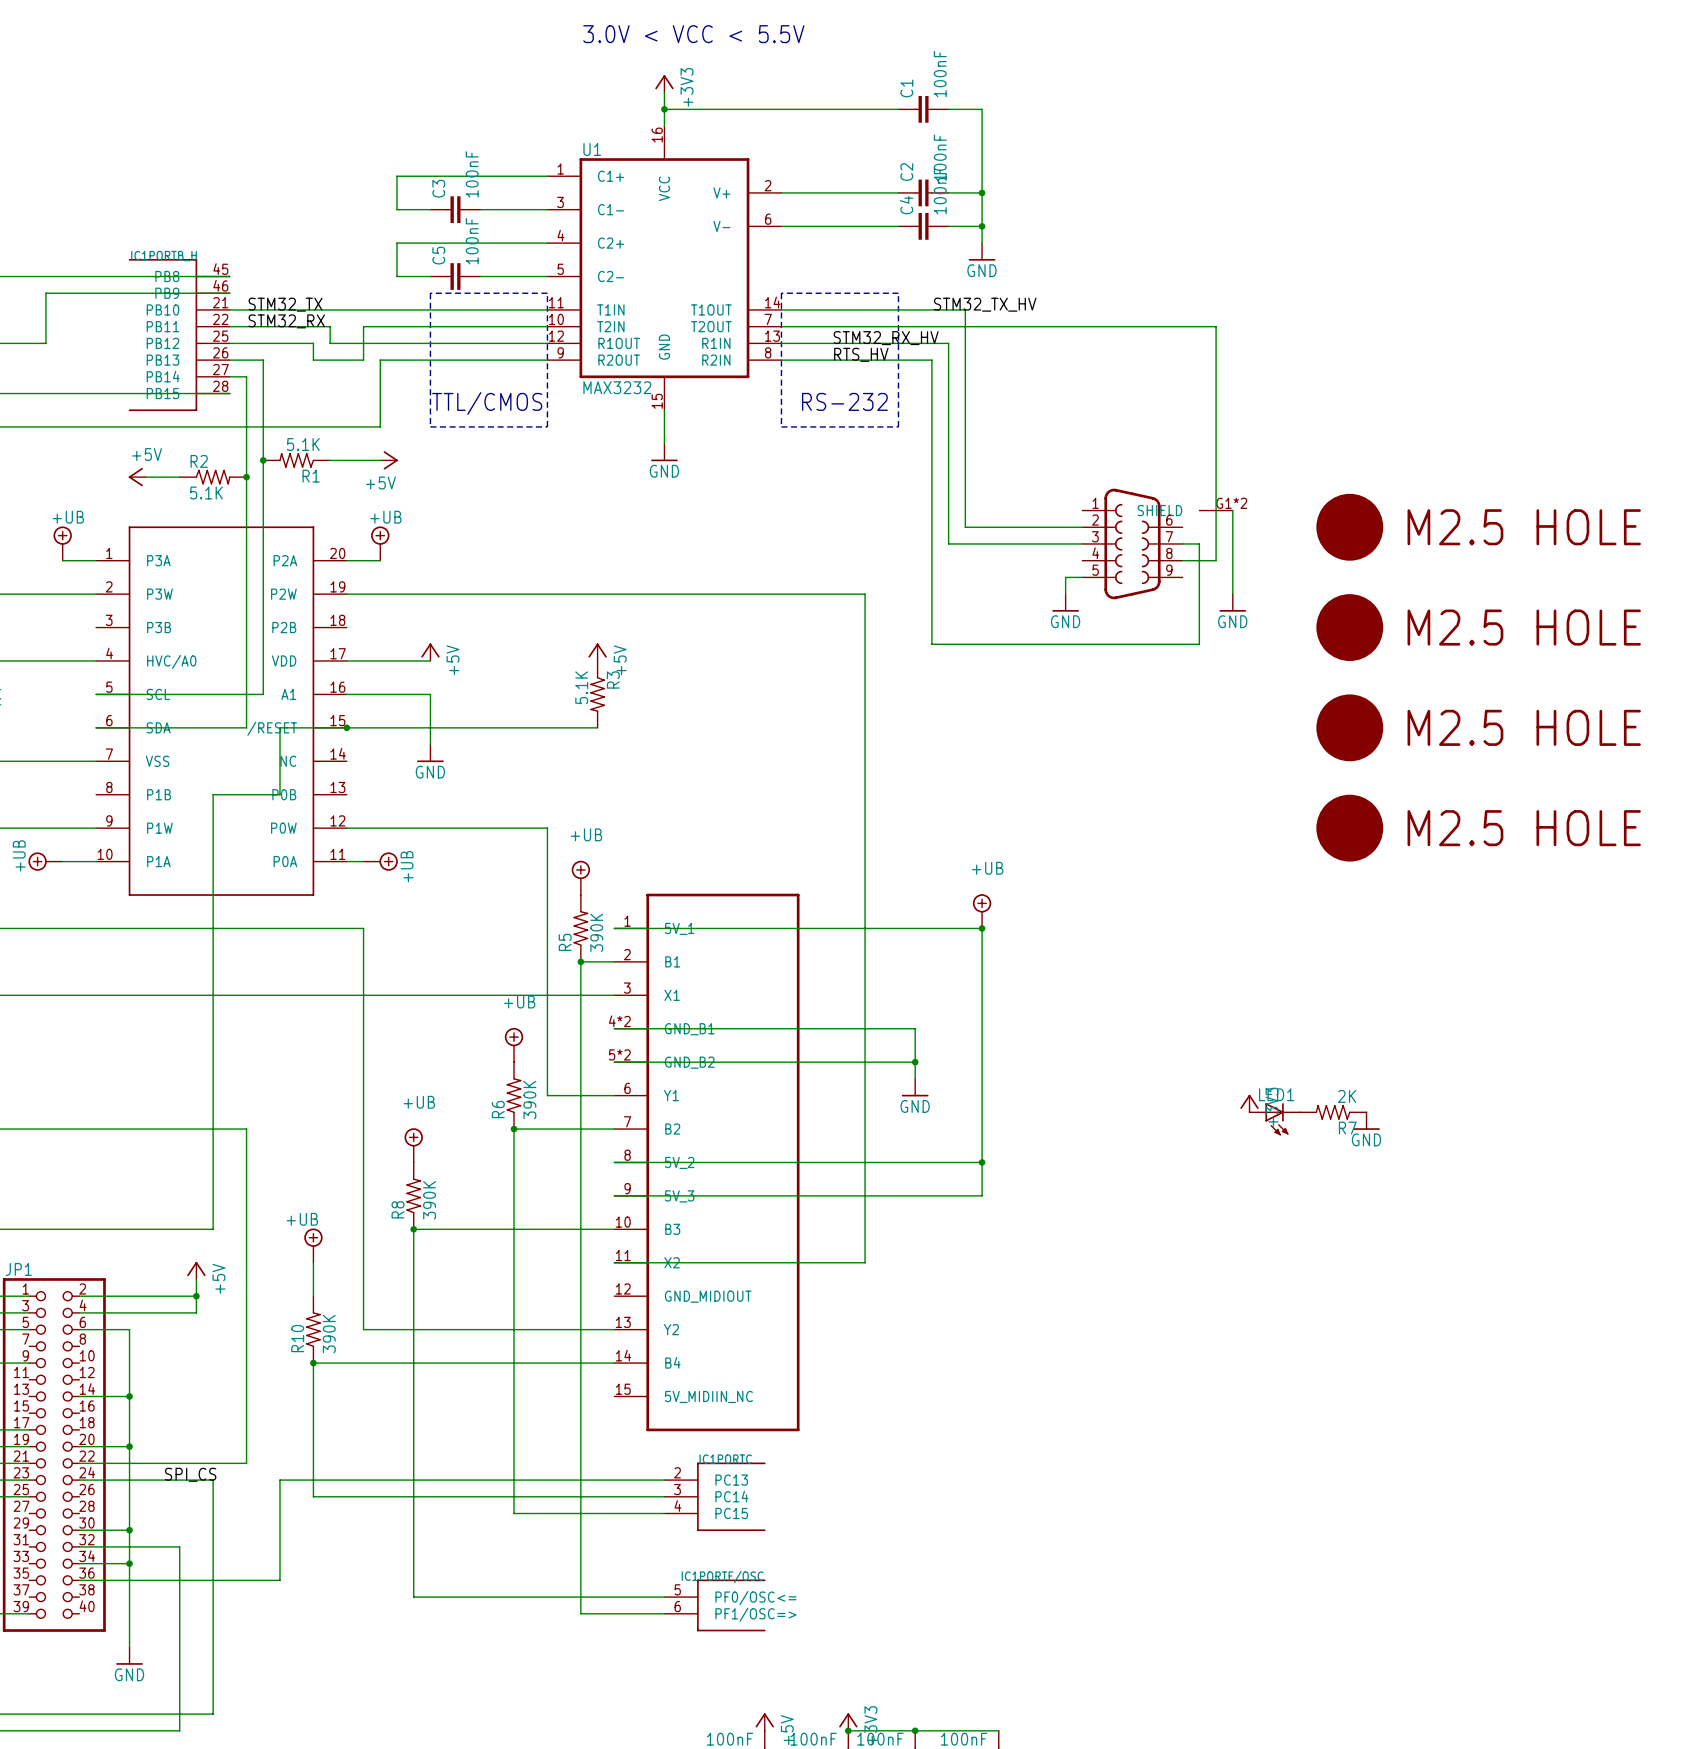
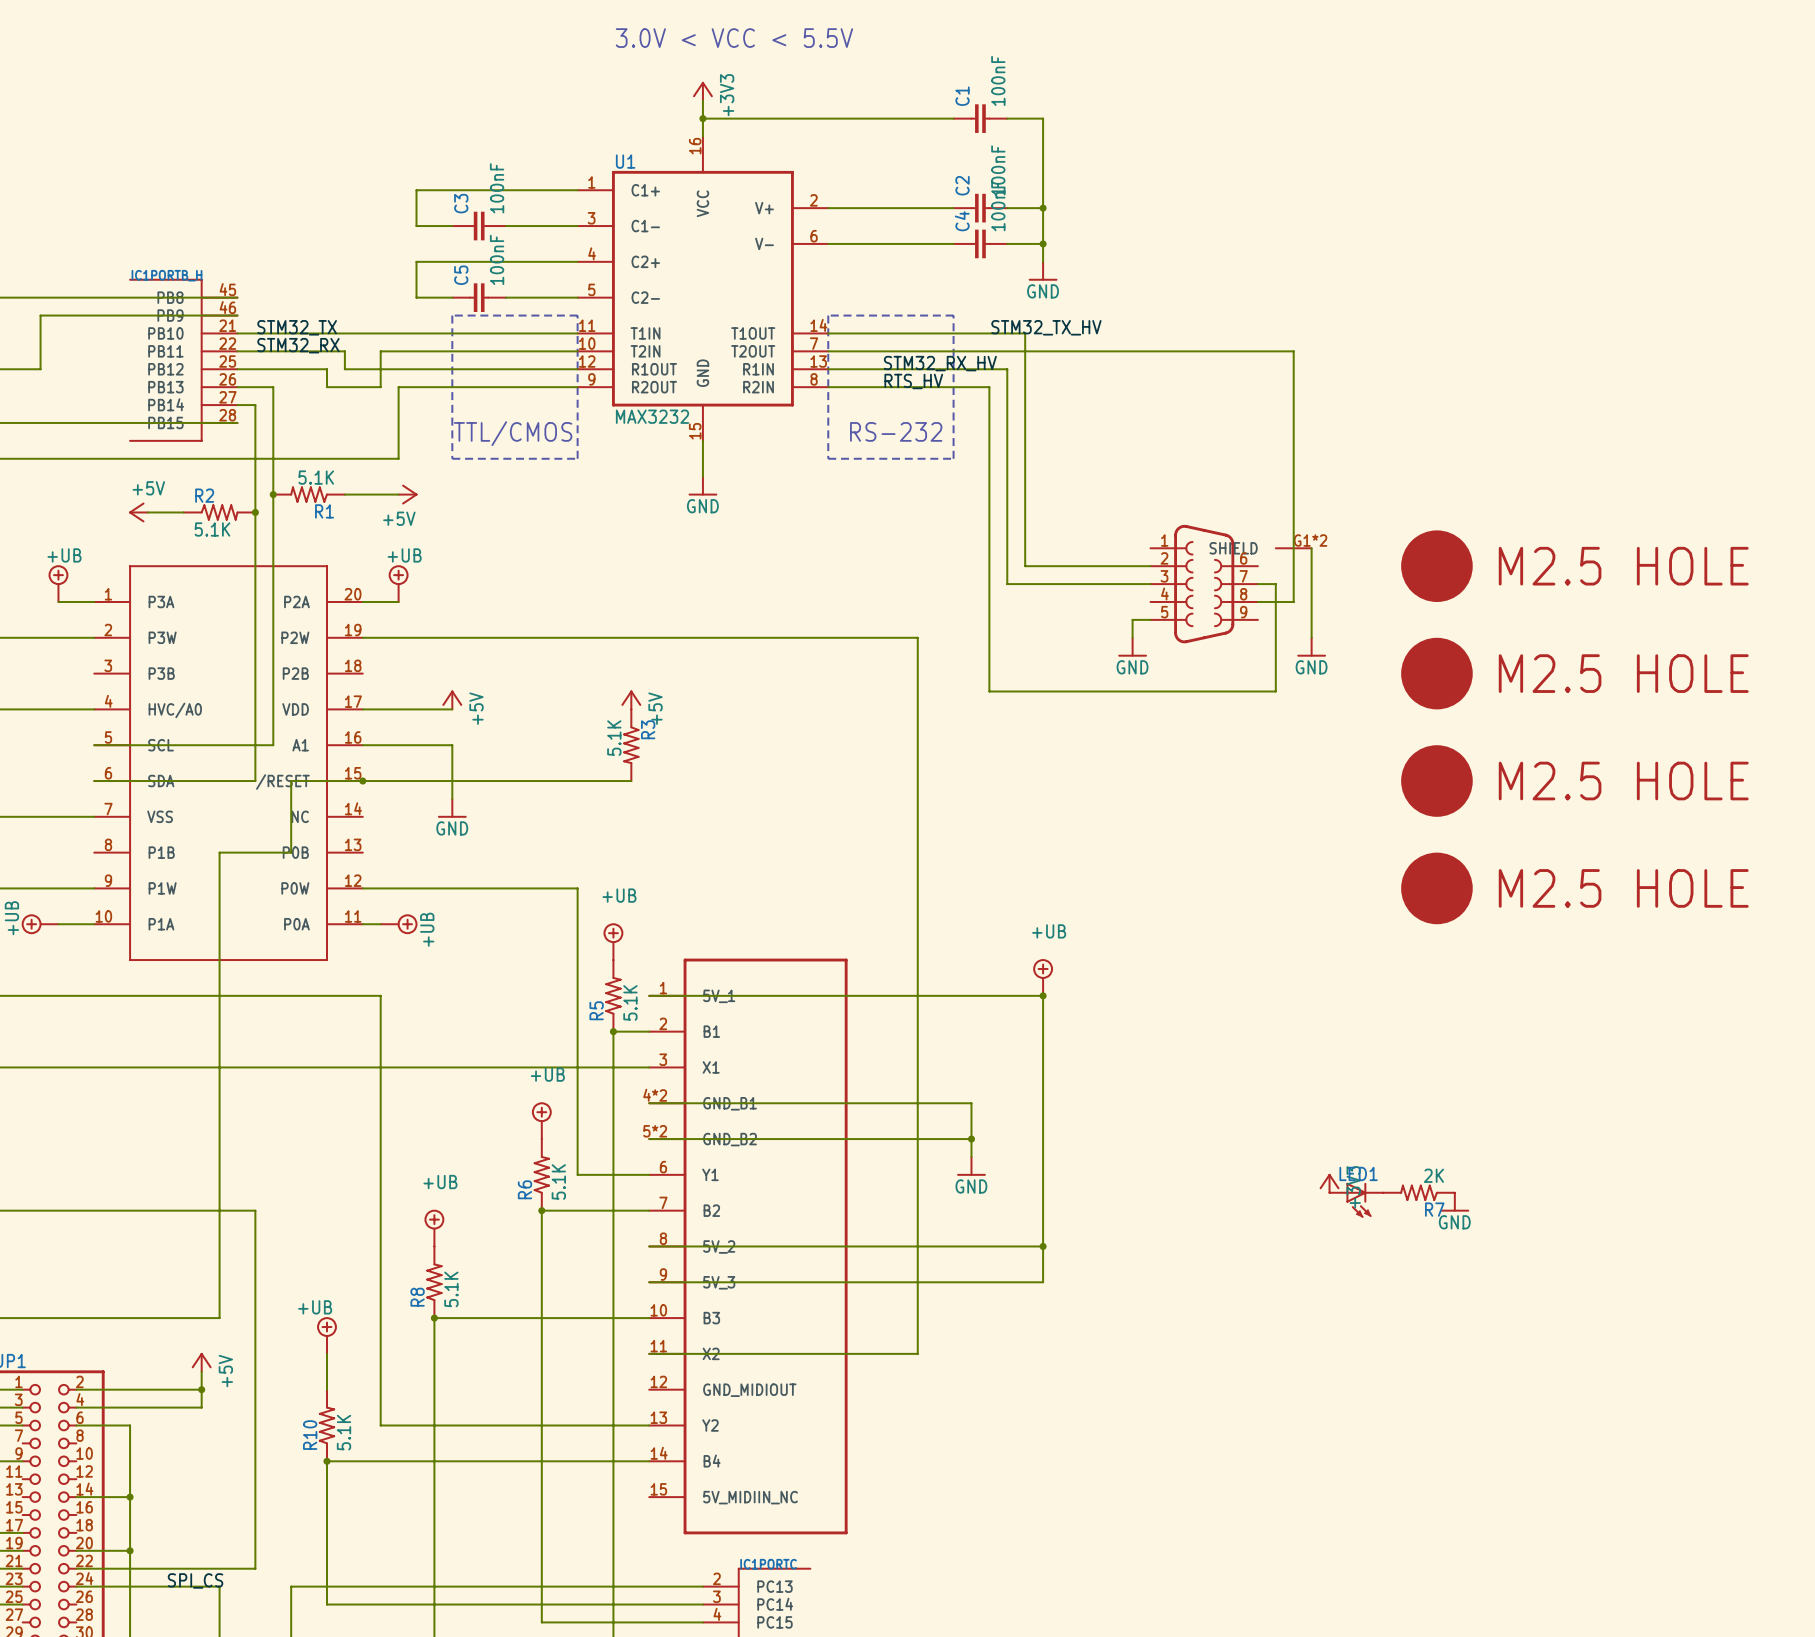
R5 value: 390K (596, 932) -> 5.1K (630, 1002)
R6 value: 390K (529, 1100) -> 5.1K (558, 1181)
R8 value: 390K (429, 1200) -> 5.1K (451, 1289)
R10 value: 390K (329, 1334) -> 5.1K (344, 1432)

